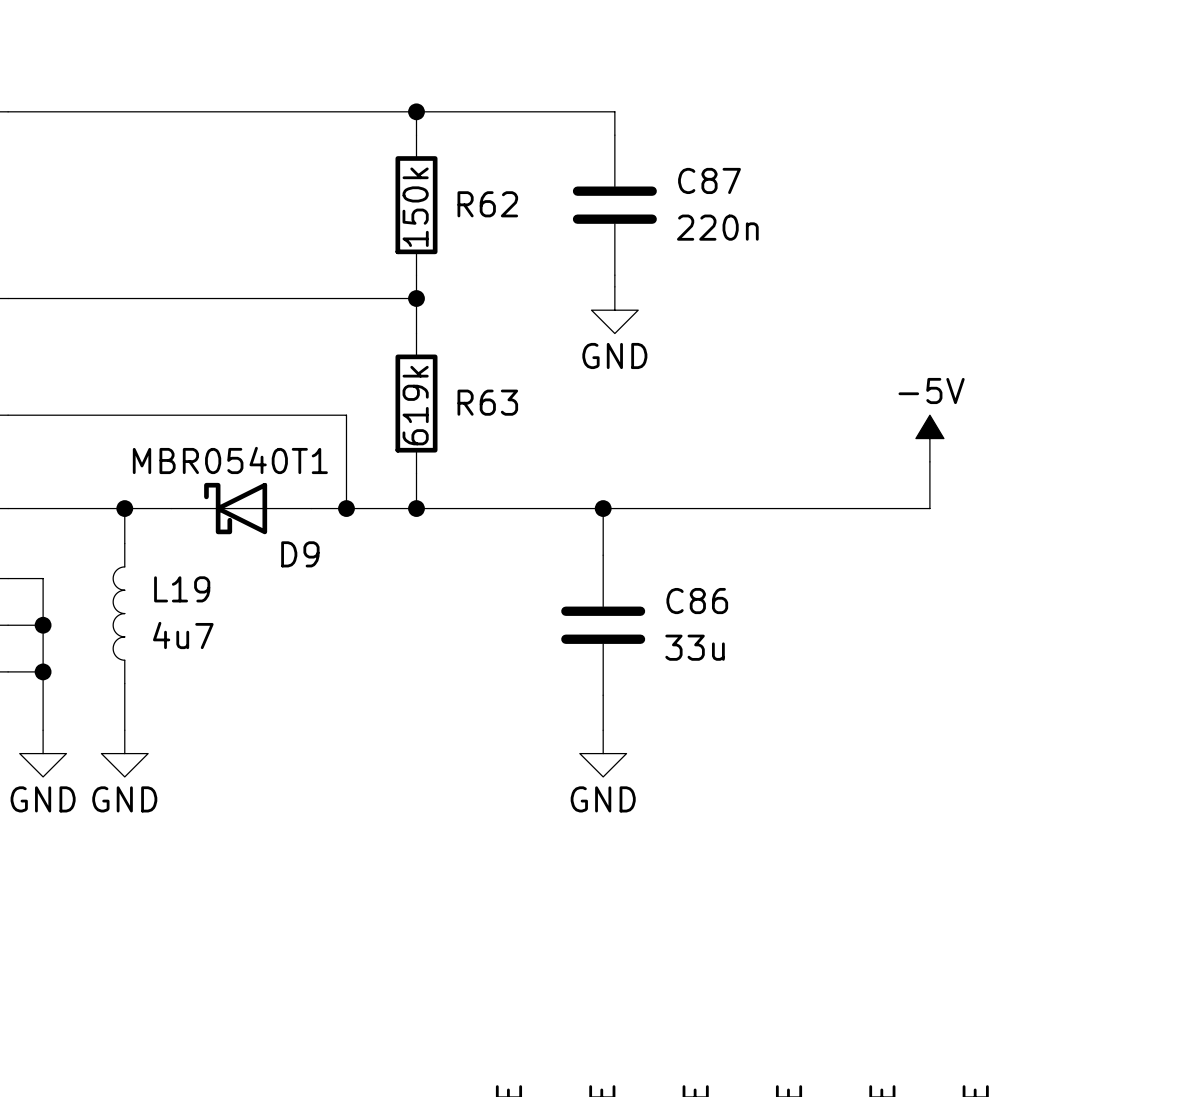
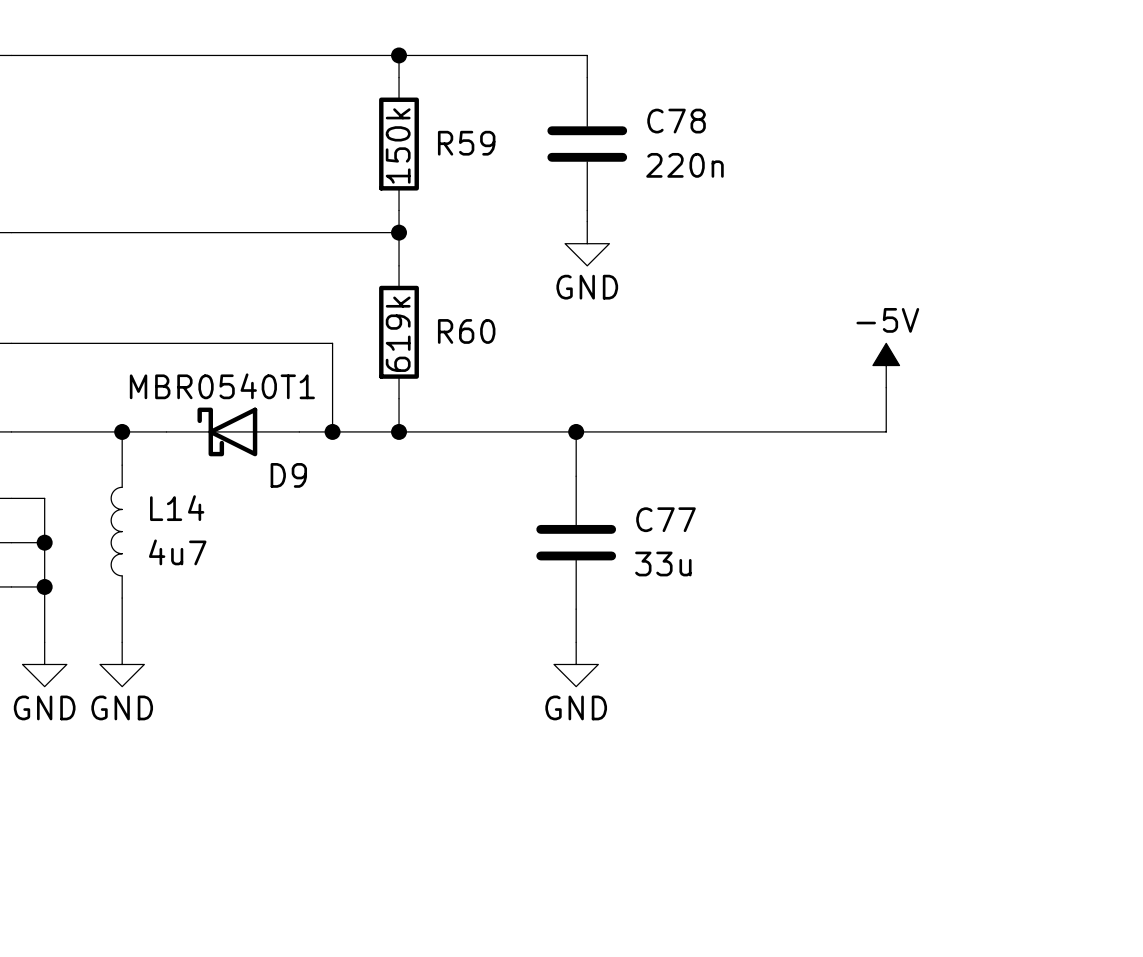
C87 name: C87 (709, 180) -> C78 (676, 121)
R62 name: R62 (487, 204) -> R59 (466, 143)
R63 name: R63 (487, 402) -> R60 (466, 331)
L19 name: L19 (182, 589) -> L14 (177, 508)
C86 name: C86 (697, 601) -> C77 (665, 519)

